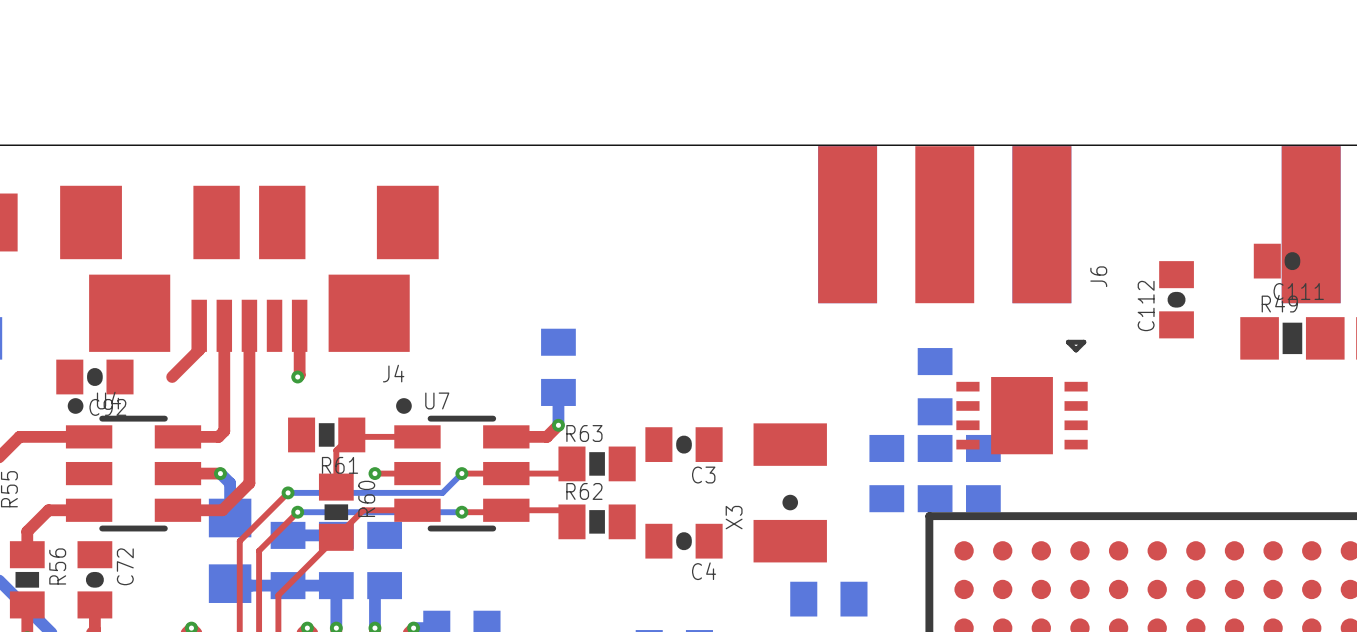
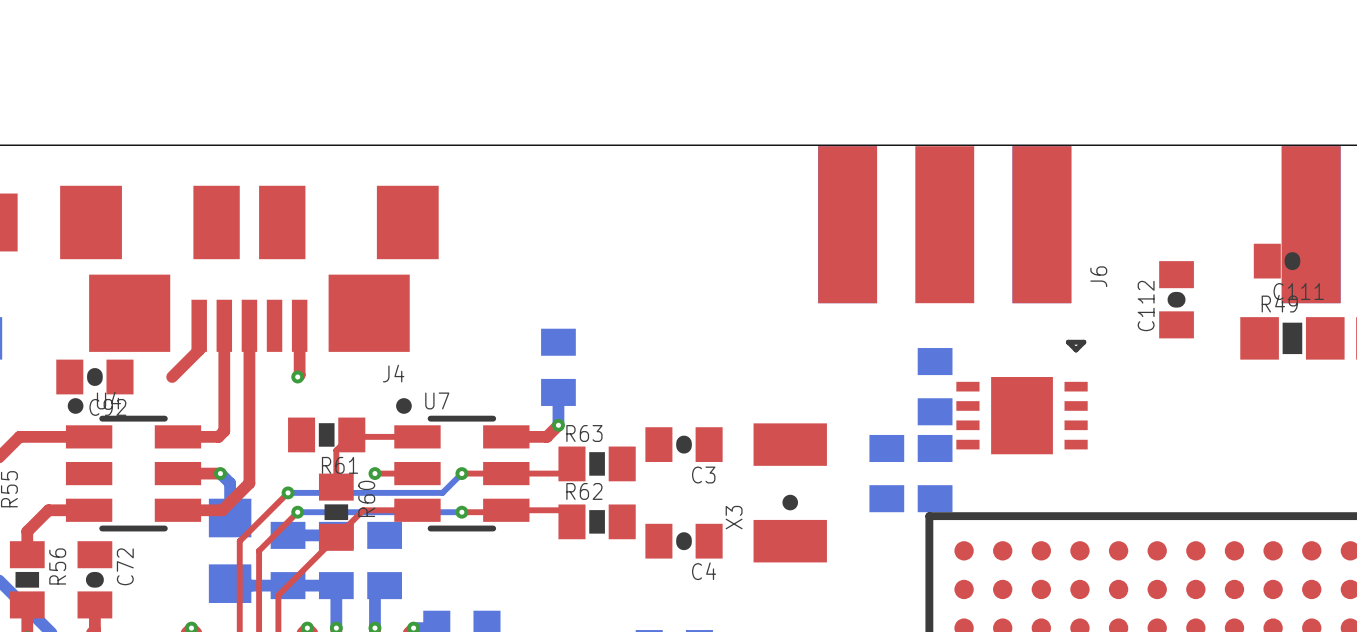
part: (983, 473) -> none
part: (828, 599) -> none

